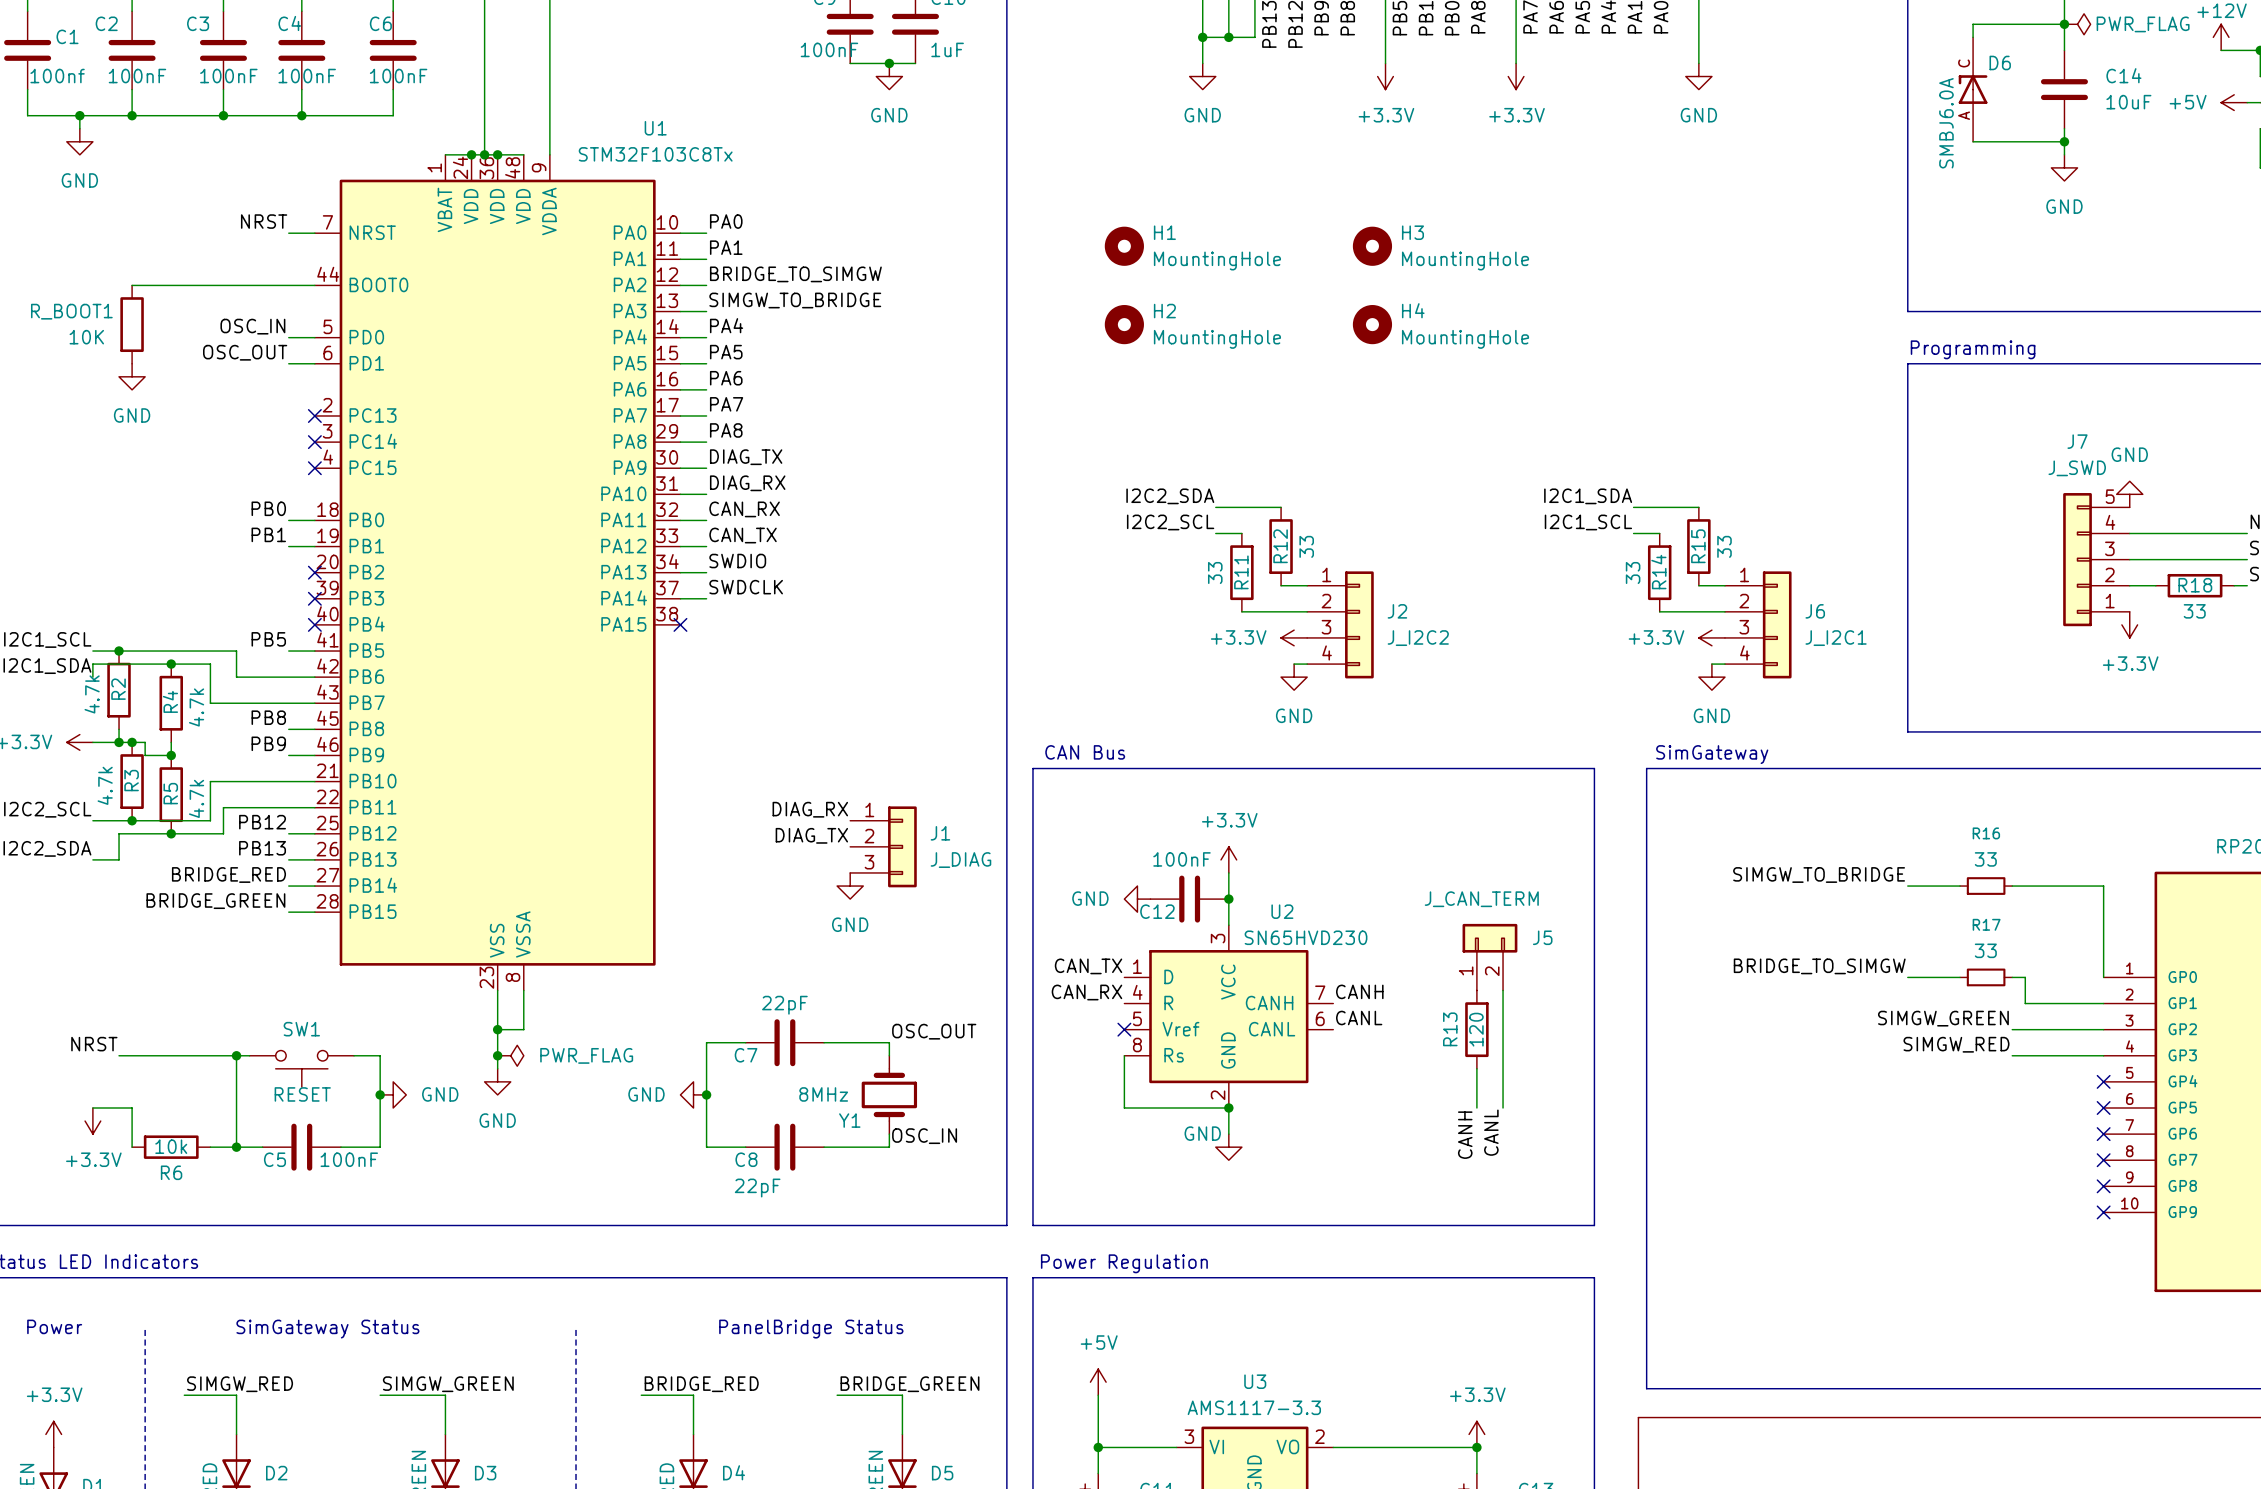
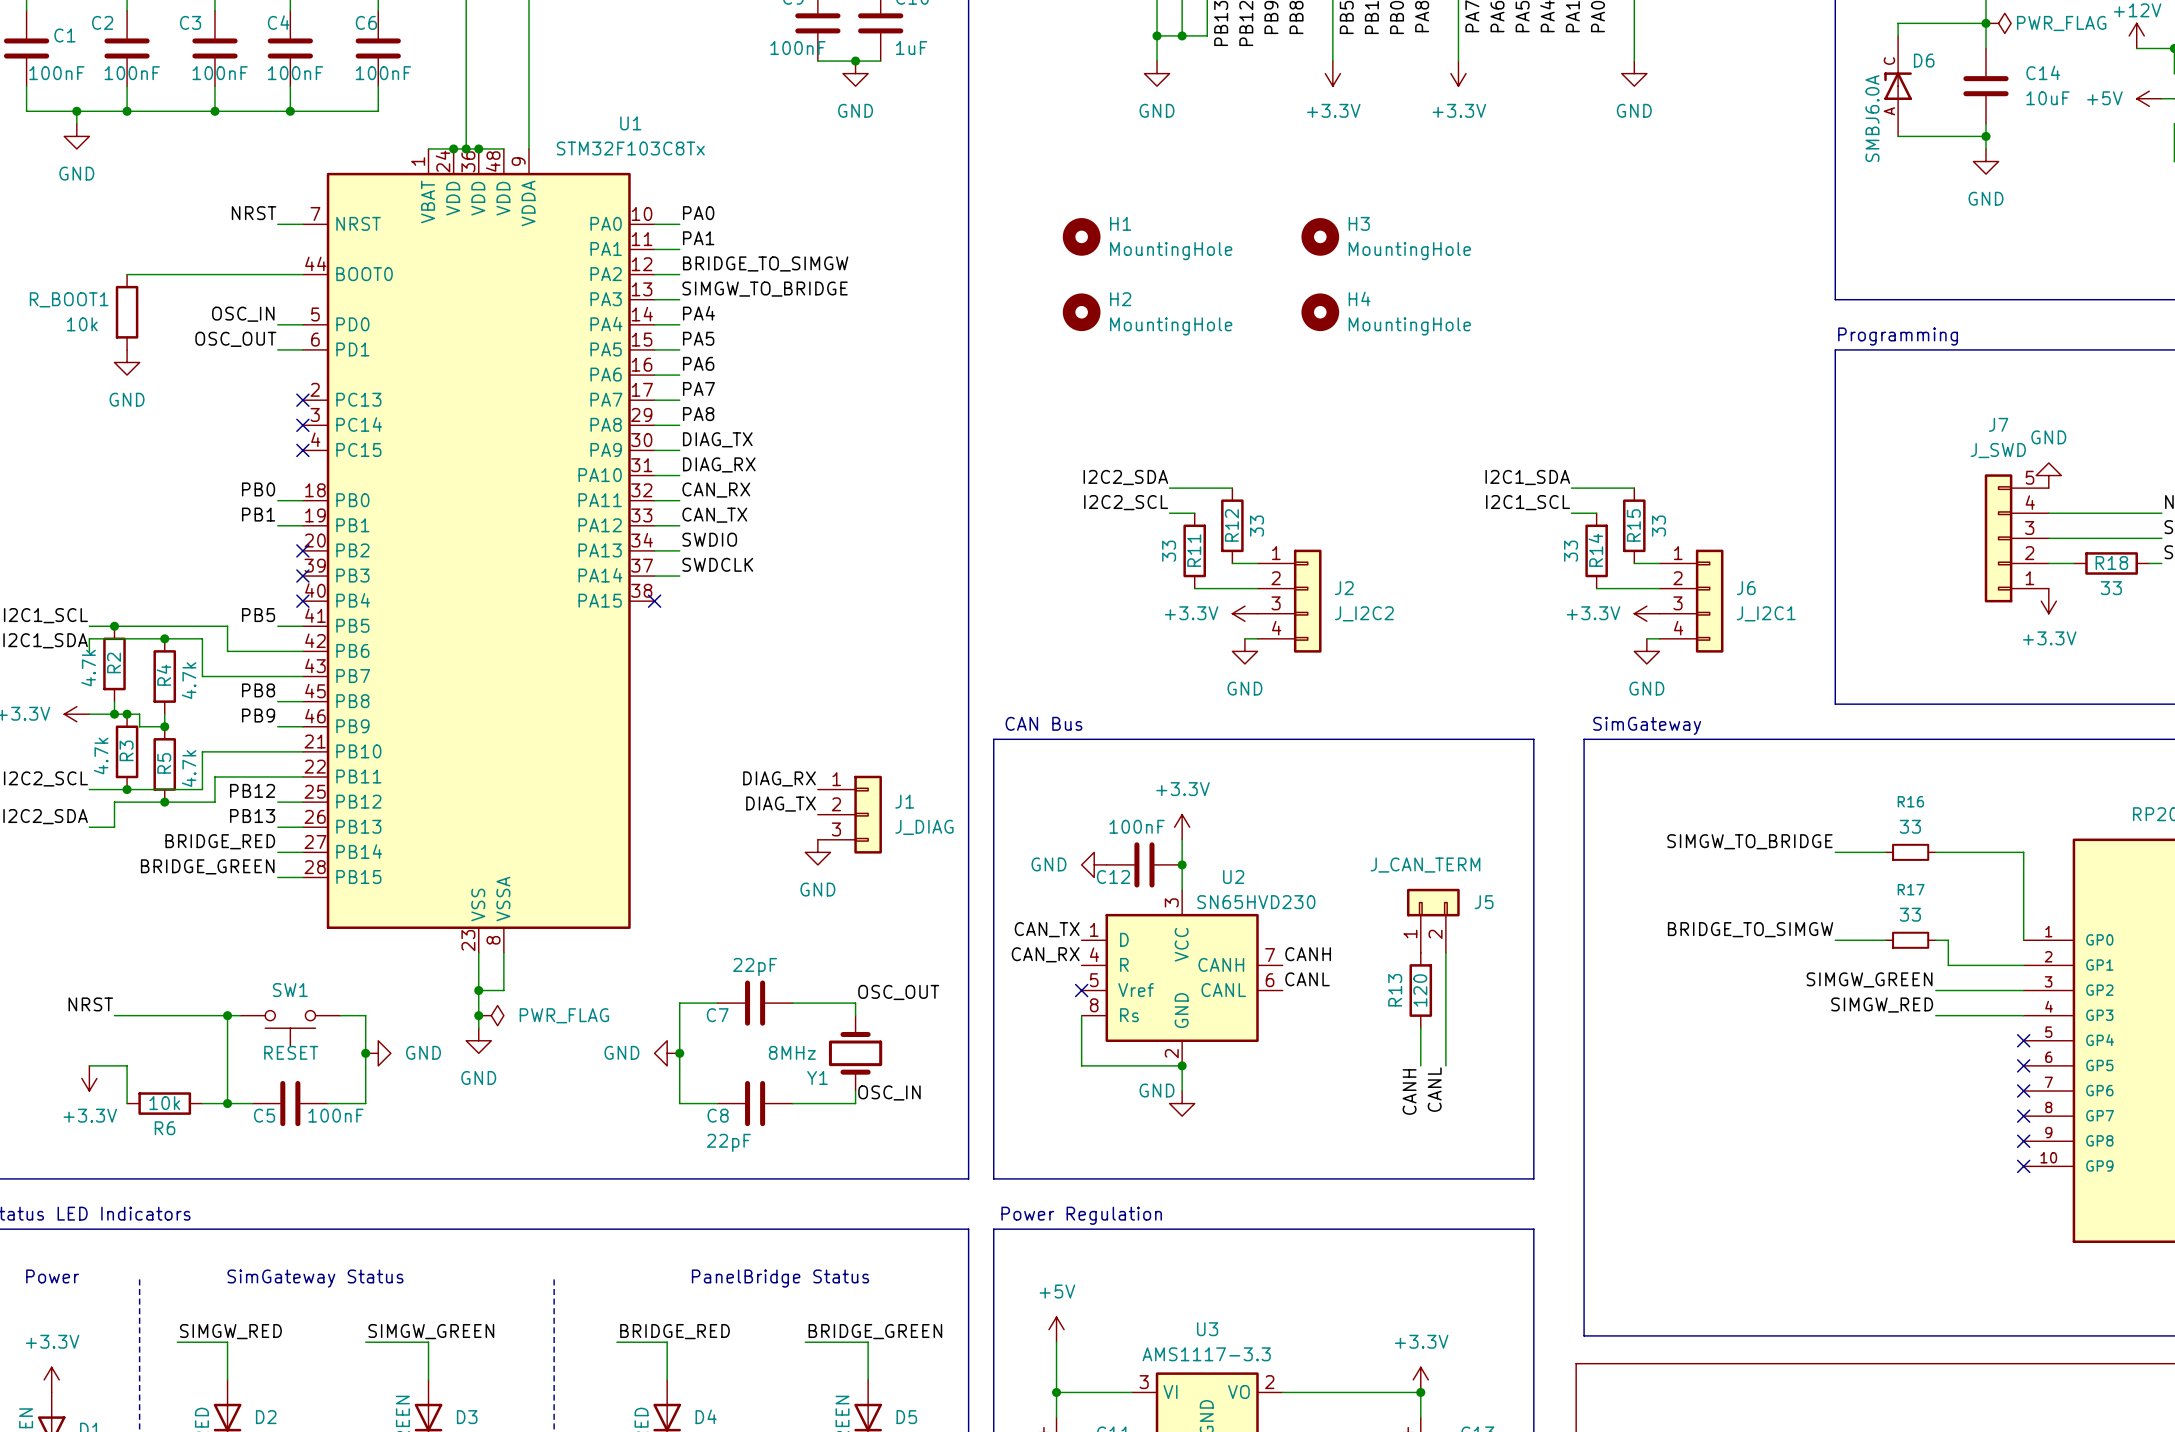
C1 value: 100nf (57, 76) -> 100nF (56, 73)
R_BOOT1 value: 10K (86, 337) -> 10k (82, 324)

